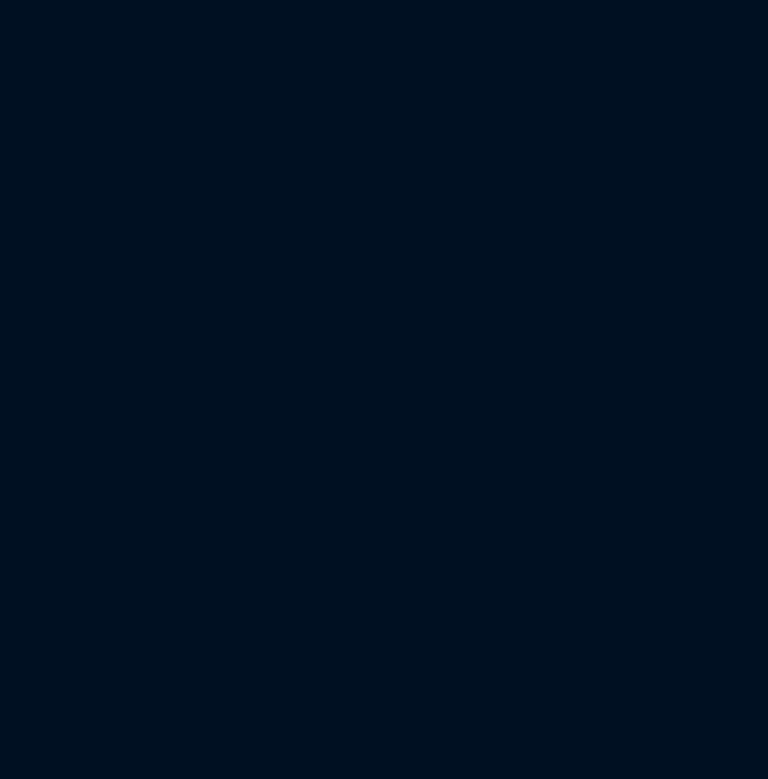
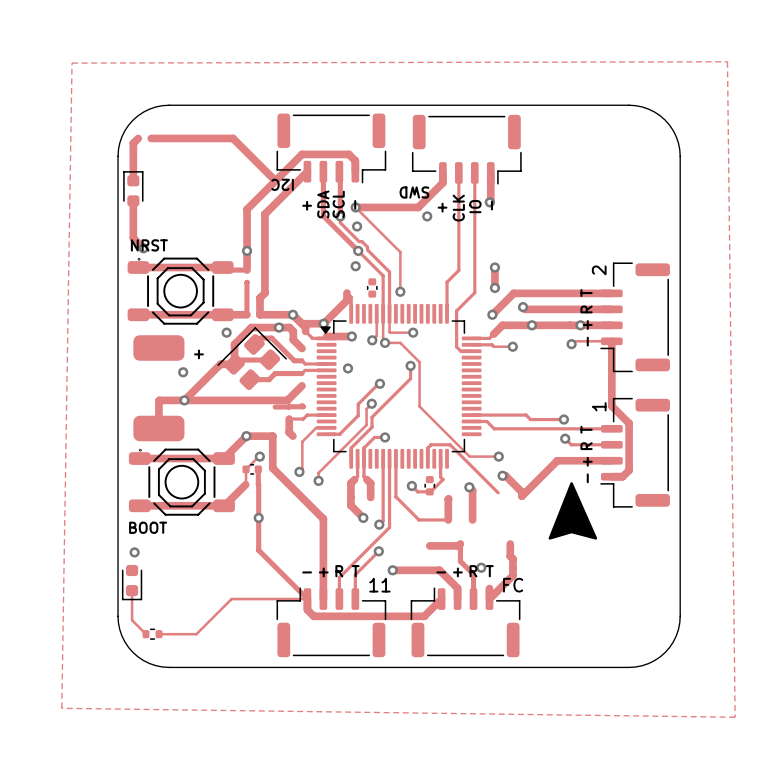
zone outline: none -> (727, 61) (72, 63) (61, 708) (735, 717) (727, 61)
board edge: none -> (169, 105) (629, 105) (648, 109) (665, 120) (676, 136) (680, 156) (680, 616) (676, 635) (665, 652) (648, 663) (629, 667) (169, 667) (149, 663) (132, 652) (121, 635) (118, 616) (118, 149) (124, 130) (138, 115) (155, 106) (169, 105)
track: none -> (138, 138) (133, 143) (133, 180)
track: none -> (151, 138) (233, 138) (275, 180)
part: none -> (331, 148)
part: none -> (466, 149)
track: none -> (307, 171) (264, 214) (264, 293) (259, 298) (259, 314) (292, 314) (305, 327) (305, 331) (312, 338) (326, 338)
track: none -> (323, 171) (323, 216) (383, 275) (383, 340) (385, 342) (400, 342) (419, 362) (419, 406) (469, 456) (498, 456)
track: none -> (339, 171) (340, 222) (359, 241) (362, 241) (367, 247) (367, 249) (389, 271) (389, 332) (413, 332)
track: none -> (355, 171) (355, 160) (348, 154) (302, 154) (247, 209) (247, 270) (225, 270) (222, 267) (138, 267)
track: none -> (442, 172) (442, 182) (418, 207) (355, 207) (400, 252) (400, 291)
track: none -> (458, 172) (458, 270) (447, 282) (447, 313)
track: none -> (474, 172) (474, 292) (456, 310) (456, 346) (460, 351) (471, 351)
track: none -> (490, 172) (489, 202)
text: none -> I2C (282, 184)
part: none -> (133, 188)
text: none -> SWD (414, 192)
track: none -> (133, 200) (133, 238) (143, 248)
via: none -> (489, 202)
text: none -> SDA (323, 204)
text: none -> SCL (338, 204)
text: none -> - (355, 204)
text: none -> + (307, 205)
text: none -> - (491, 205)
text: none -> IO (475, 206)
via: none -> (355, 207)
text: none -> + (442, 207)
text: none -> CLK (458, 208)
via: none -> (340, 216)
via: none -> (427, 216)
via: none -> (357, 226)
text: none -> NRST (149, 245)
via: none -> (143, 248)
via: none -> (247, 250)
via: none -> (358, 250)
via: none -> (355, 266)
track: none -> (494, 267) (494, 287)
via: none -> (494, 267)
text: none -> 2 (599, 270)
track: none -> (246, 282) (246, 314) (138, 314)
part: none -> (372, 287)
via: none -> (494, 287)
part: none -> (180, 291)
via: none -> (400, 291)
text: none -> T (586, 293)
track: none -> (611, 293) (513, 293) (492, 314)
track: none -> (523, 307) (525, 309) (611, 309)
via: none -> (523, 307)
text: none -> R (586, 309)
track: none -> (351, 313) (351, 297) (346, 293) (346, 300) (323, 323) (301, 323)
track: none -> (376, 313) (376, 335) (372, 340)
via: none -> (292, 314)
via: none -> (492, 314)
part: none -> (635, 317)
via: none -> (323, 323)
via: none -> (531, 325)
via: none -> (580, 325)
text: none -> + (587, 325)
track: none -> (611, 325) (502, 325) (489, 338) (471, 338)
via: none -> (279, 327)
via: none -> (226, 332)
via: none -> (413, 332)
track: none -> (326, 336) (351, 336)
via: none -> (351, 336)
via: none -> (372, 340)
text: none -> - (587, 341)
via: none -> (385, 342)
track: none -> (254, 344) (260, 338) (271, 338) (294, 360) (302, 360) (305, 363) (326, 363)
track: none -> (471, 344) (512, 346)
track: none -> (571, 344) (574, 341) (611, 341) (611, 406) (629, 423) (629, 470) (622, 476) (611, 476)
via: none -> (571, 344)
via: none -> (512, 346)
part: none -> (158, 348)
track: none -> (302, 348) (293, 339) (293, 331) (289, 327) (251, 327) (234, 344) (234, 364)
text: none -> + (198, 354)
part: none -> (252, 358)
track: none -> (269, 359) (238, 360) (234, 364)
track: none -> (234, 364) (220, 364) (184, 400)
track: none -> (410, 365) (410, 378) (372, 417) (372, 427) (351, 448) (351, 458)
via: none -> (410, 365)
via: none -> (348, 368)
track: none -> (326, 370) (305, 370) (302, 373) (275, 373) (269, 379) (249, 379)
via: none -> (183, 372)
track: none -> (379, 383) (358, 404) (358, 415) (339, 434) (326, 434)
via: none -> (379, 383)
track: none -> (302, 385) (287, 400) (159, 400) (158, 428)
part: none -> (399, 386)
via: none -> (184, 400)
track: none -> (371, 403) (366, 408) (366, 424) (318, 472) (318, 480)
via: none -> (371, 403)
track: none -> (302, 405) (303, 406) (275, 407)
text: none -> 1 (599, 406)
track: none -> (326, 415) (307, 415) (303, 419) (289, 419) (289, 432) (292, 436)
track: none -> (471, 415) (526, 415) (530, 419) (563, 419)
via: none -> (563, 419)
track: none -> (471, 421) (486, 421) (494, 428) (611, 428)
track: none -> (326, 427) (316, 427) (302, 441) (302, 469) (299, 471)
part: none -> (158, 428)
text: none -> T (586, 429)
via: none -> (246, 436)
track: none -> (385, 437) (374, 437) (363, 448) (363, 476) (370, 483) (370, 497)
via: none -> (385, 437)
track: none -> (565, 438) (571, 444) (611, 444)
via: none -> (565, 438)
text: none -> R (586, 446)
part: none -> (635, 452)
track: none -> (259, 456) (246, 469) (246, 484) (224, 505) (139, 505)
via: none -> (259, 456)
via: none -> (498, 456)
track: none -> (139, 458) (224, 458) (246, 436) (272, 436) (272, 468) (323, 518) (323, 599)
track: none -> (357, 458) (357, 476) (350, 483) (350, 505) (363, 517)
track: none -> (383, 458) (383, 520) (379, 524)
track: none -> (389, 458) (389, 527) (339, 577) (339, 599)
track: none -> (395, 458) (395, 496) (419, 519) (448, 519) (448, 498)
track: none -> (427, 458) (427, 448) (431, 444) (450, 444) (498, 492)
track: none -> (440, 458) (440, 477) (443, 479) (430, 491) (417, 491) (411, 485)
track: none -> (611, 460) (557, 460) (521, 496) (521, 492) (505, 475) (502, 475)
text: none -> + (587, 461)
part: none -> (252, 469)
track: none -> (258, 469) (258, 550) (307, 599)
via: none -> (299, 471)
via: none -> (502, 475)
text: none -> - (587, 478)
via: none -> (318, 480)
part: none -> (181, 482)
drawing: none -> [548, 482, 598, 540]
via: none -> (411, 485)
part: none -> (429, 485)
track: none -> (469, 487) (472, 490) (472, 519)
via: none -> (469, 487)
via: none -> (258, 517)
via: none -> (363, 517)
via: none -> (379, 524)
text: none -> BOOT (148, 527)
track: none -> (510, 544) (512, 575) (489, 599) (489, 588)
track: none -> (429, 545) (458, 545) (460, 544) (460, 561) (473, 574) (473, 599)
track: none -> (378, 551) (355, 574) (355, 599)
via: none -> (378, 551)
via: none -> (134, 552)
via: none -> (481, 567)
track: none -> (392, 570) (439, 570) (457, 588) (457, 599)
via: none -> (392, 570)
text: none -> + (323, 572)
text: none -> R (339, 571)
text: none -> T (355, 571)
text: none -> + (457, 572)
text: none -> R (473, 571)
text: none -> T (489, 571)
text: none -> - (307, 572)
text: none -> - (441, 572)
part: none -> (132, 582)
text: none -> 11 (379, 585)
text: none -> FC (513, 585)
track: none -> (132, 590) (132, 620) (146, 634)
track: none -> (307, 599) (231, 599) (196, 634) (159, 634)
track: none -> (307, 599) (307, 609) (313, 616) (424, 616) (441, 599)
part: none -> (331, 622)
part: none -> (465, 622)
part: none -> (152, 634)

